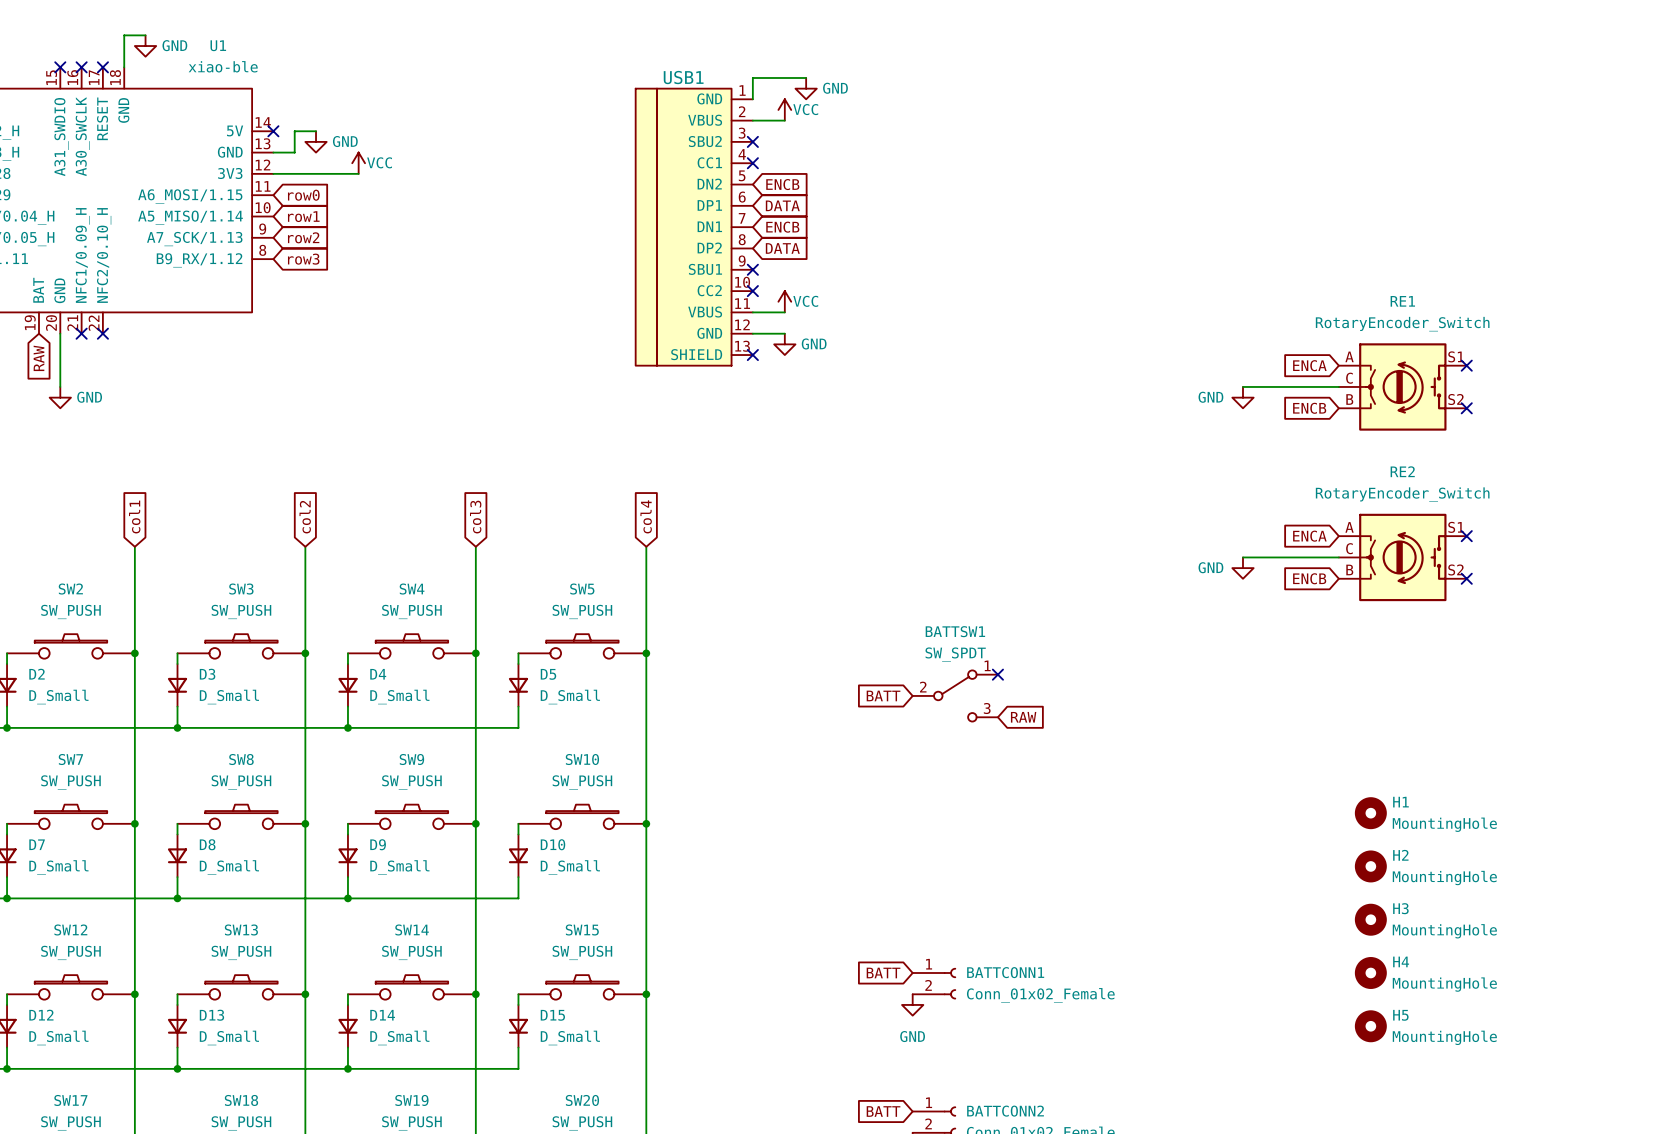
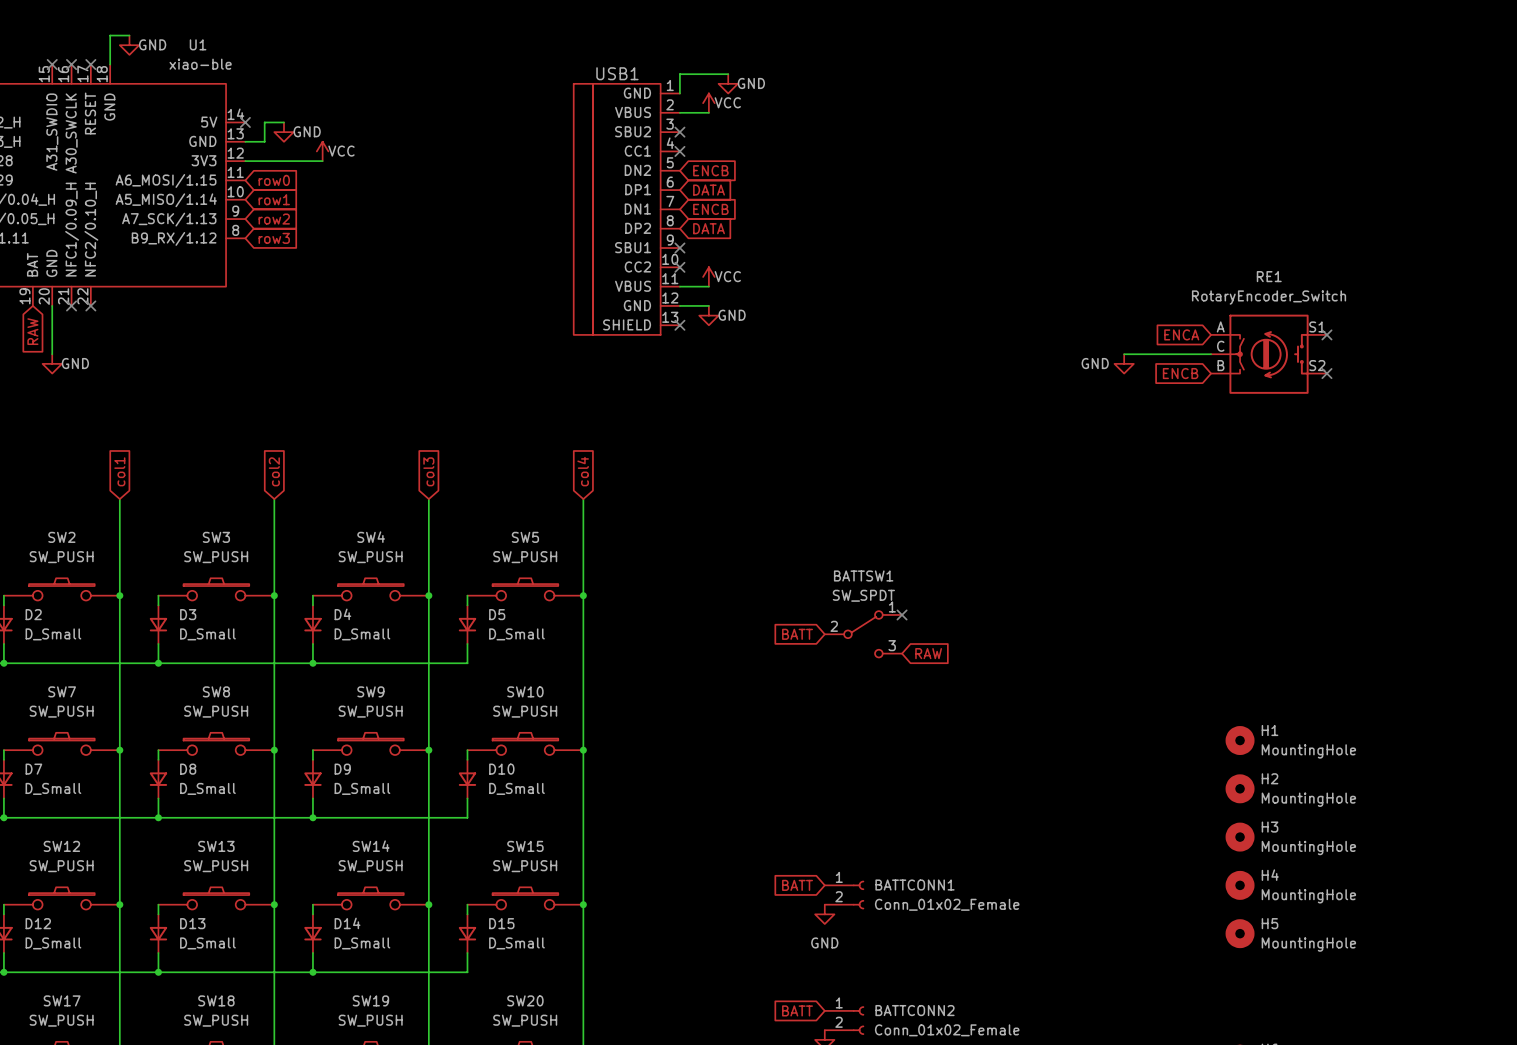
global label: ENCA (1309, 536) -> none
no-connect mark: (1466, 536) -> none
wire: (1242, 557) (1338, 557) -> none
RE2: RotaryEncoder_Switch (1402, 557) -> none
power symbol: GND (1242, 568) -> none
global label: ENCB (1309, 578) -> none
no-connect mark: (1466, 578) -> none

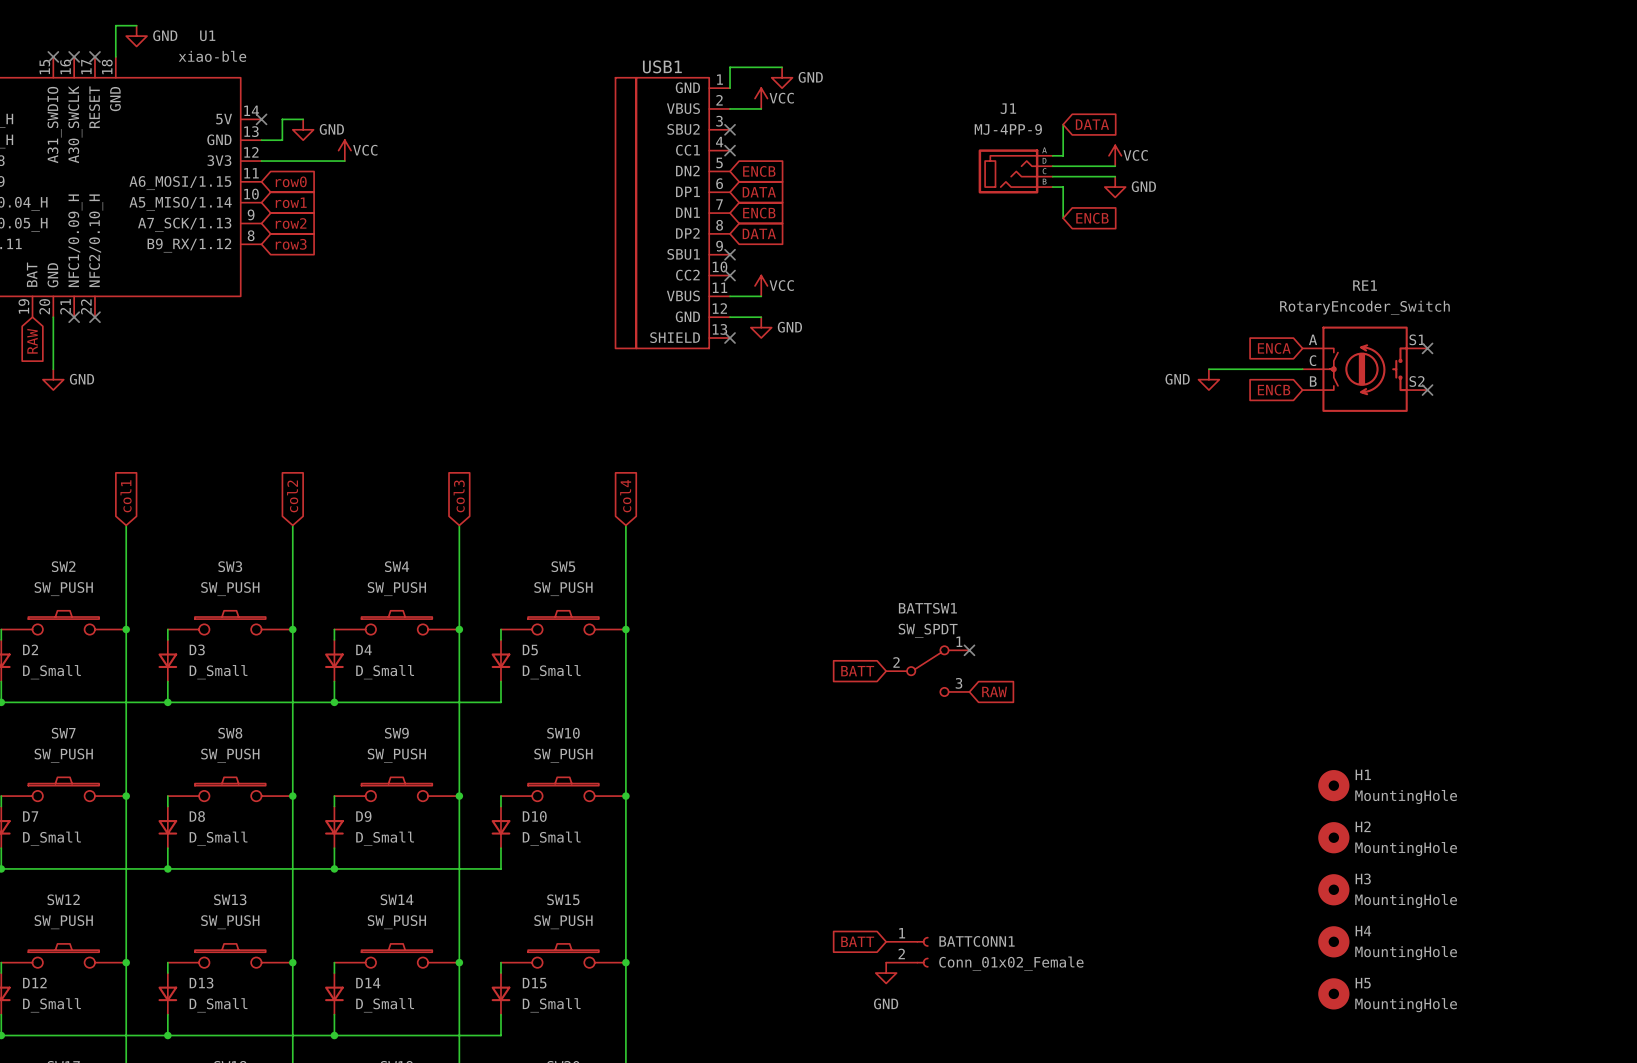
wire: none -> (1063, 124) (1063, 155) (1052, 155)
global label: none -> DATA (1092, 124)
power symbol: none -> VCC (1115, 155)
wire: none -> (1052, 166) (1115, 166)
J1: none -> MJ-4PP-9 (1015, 171)
wire: none -> (1052, 176) (1115, 176)
wire: none -> (1052, 187) (1063, 187) (1063, 218)
power symbol: none -> GND (1115, 187)
global label: none -> ENCB (1092, 218)

